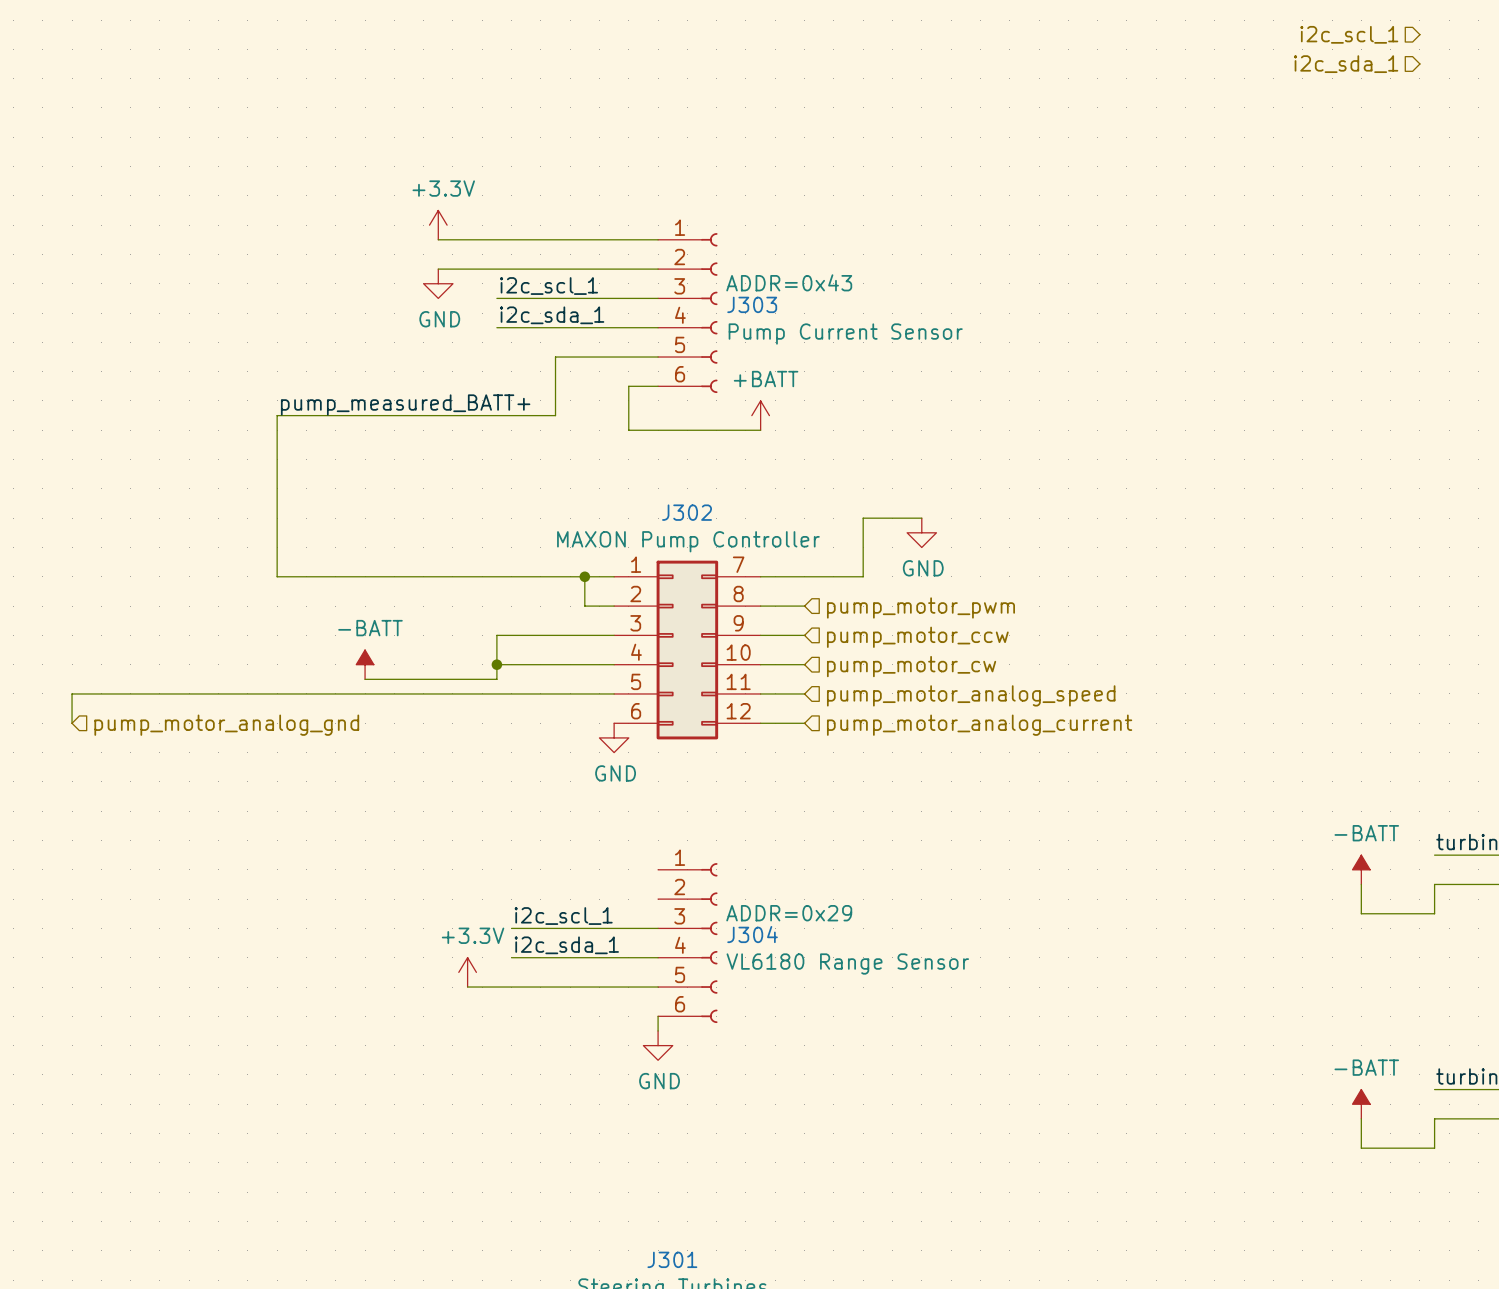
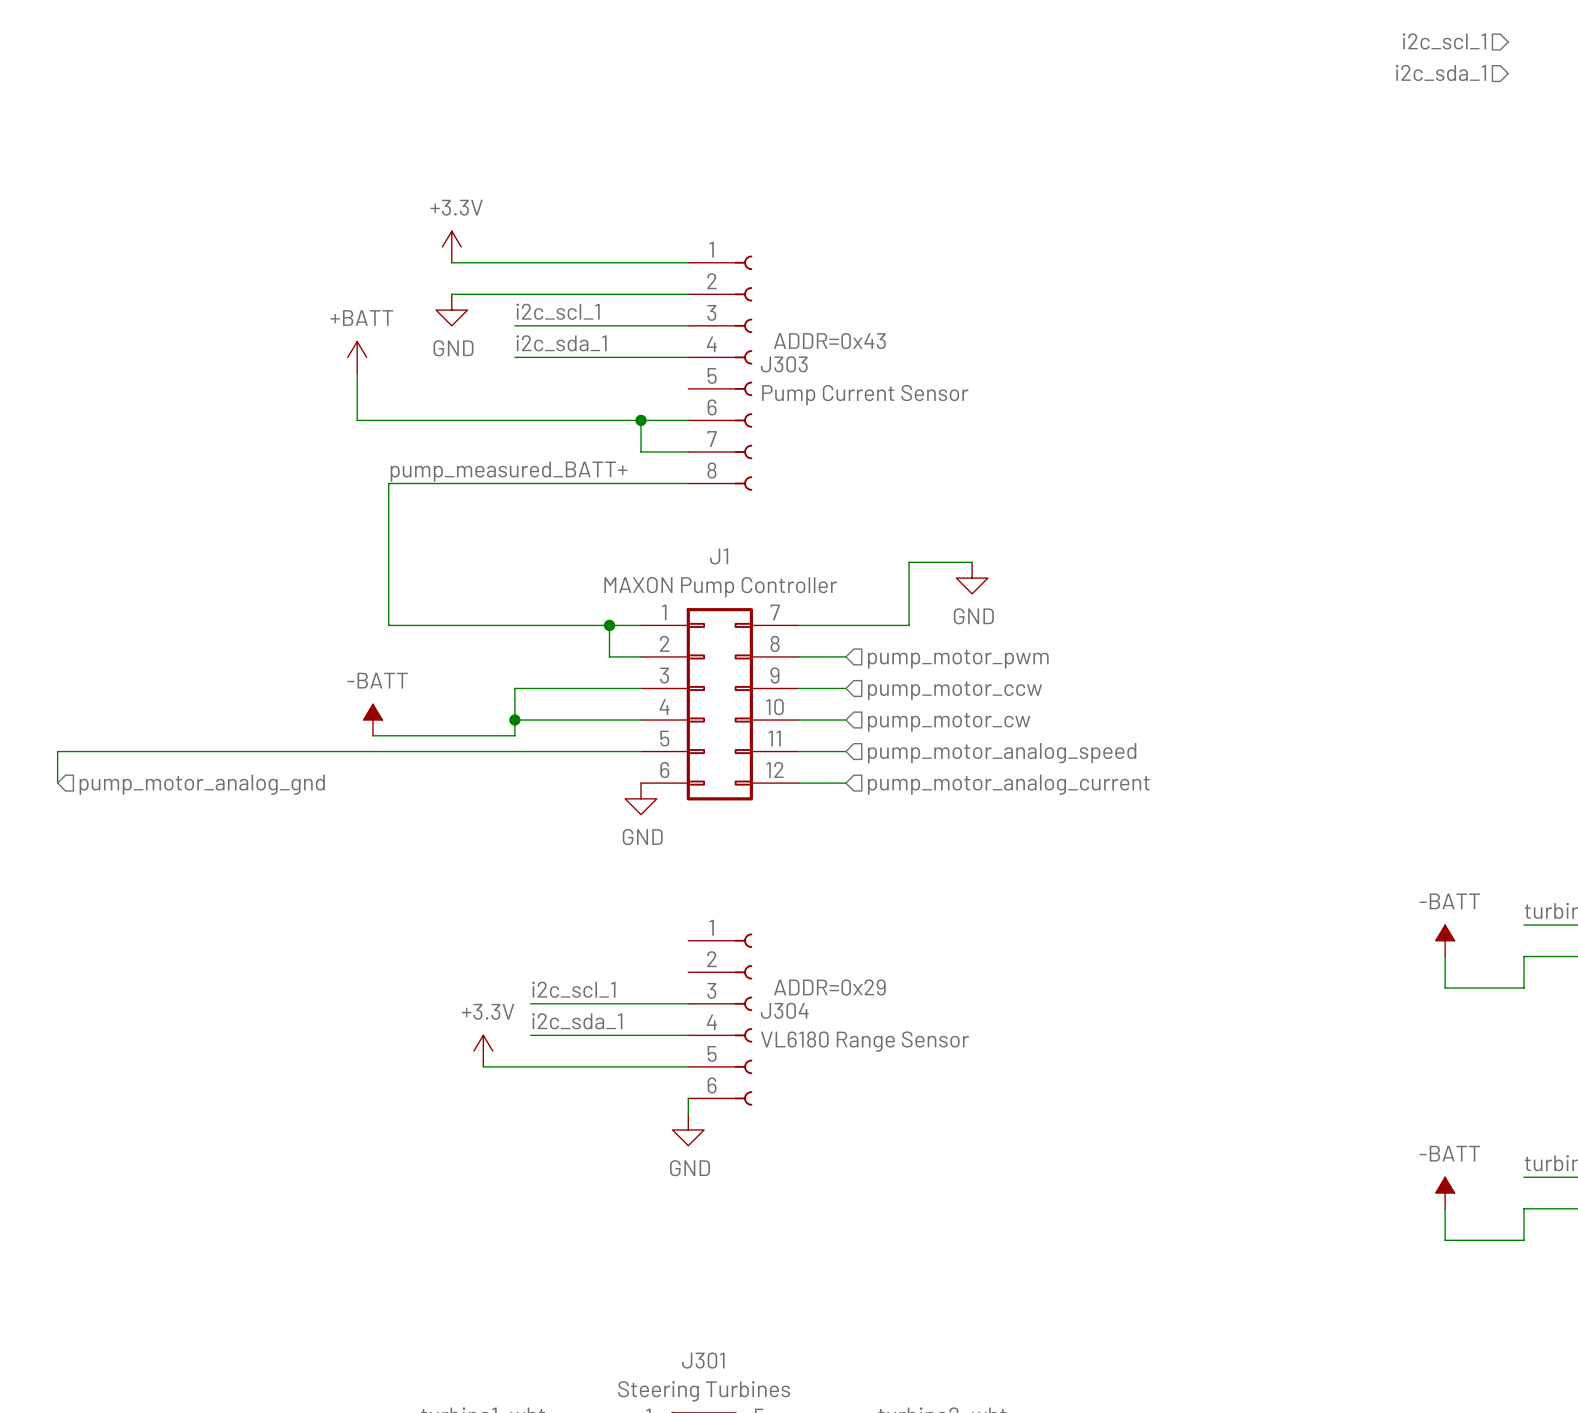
J303 symbol: [658, 233, 718, 394] -> [688, 255, 753, 491]
power symbol: none -> +BATT (357, 357)
wire: (658, 357) (555, 357) (555, 415) (277, 415) (277, 576) (379, 576) -> (688, 483) (388, 483) (388, 625)
wire: none -> (641, 420) (641, 451) (688, 451)
junction: none -> (641, 420)
wire: (628, 386) (628, 430) (760, 430) -> (656, 420) (357, 420) (357, 373)
label position: pump_measured_BATT+ (405, 404) -> pump_measured_BATT+ (509, 471)
power symbol: +BATT (760, 415) -> none
J302 name: J302 (687, 512) -> J1 (719, 556)

